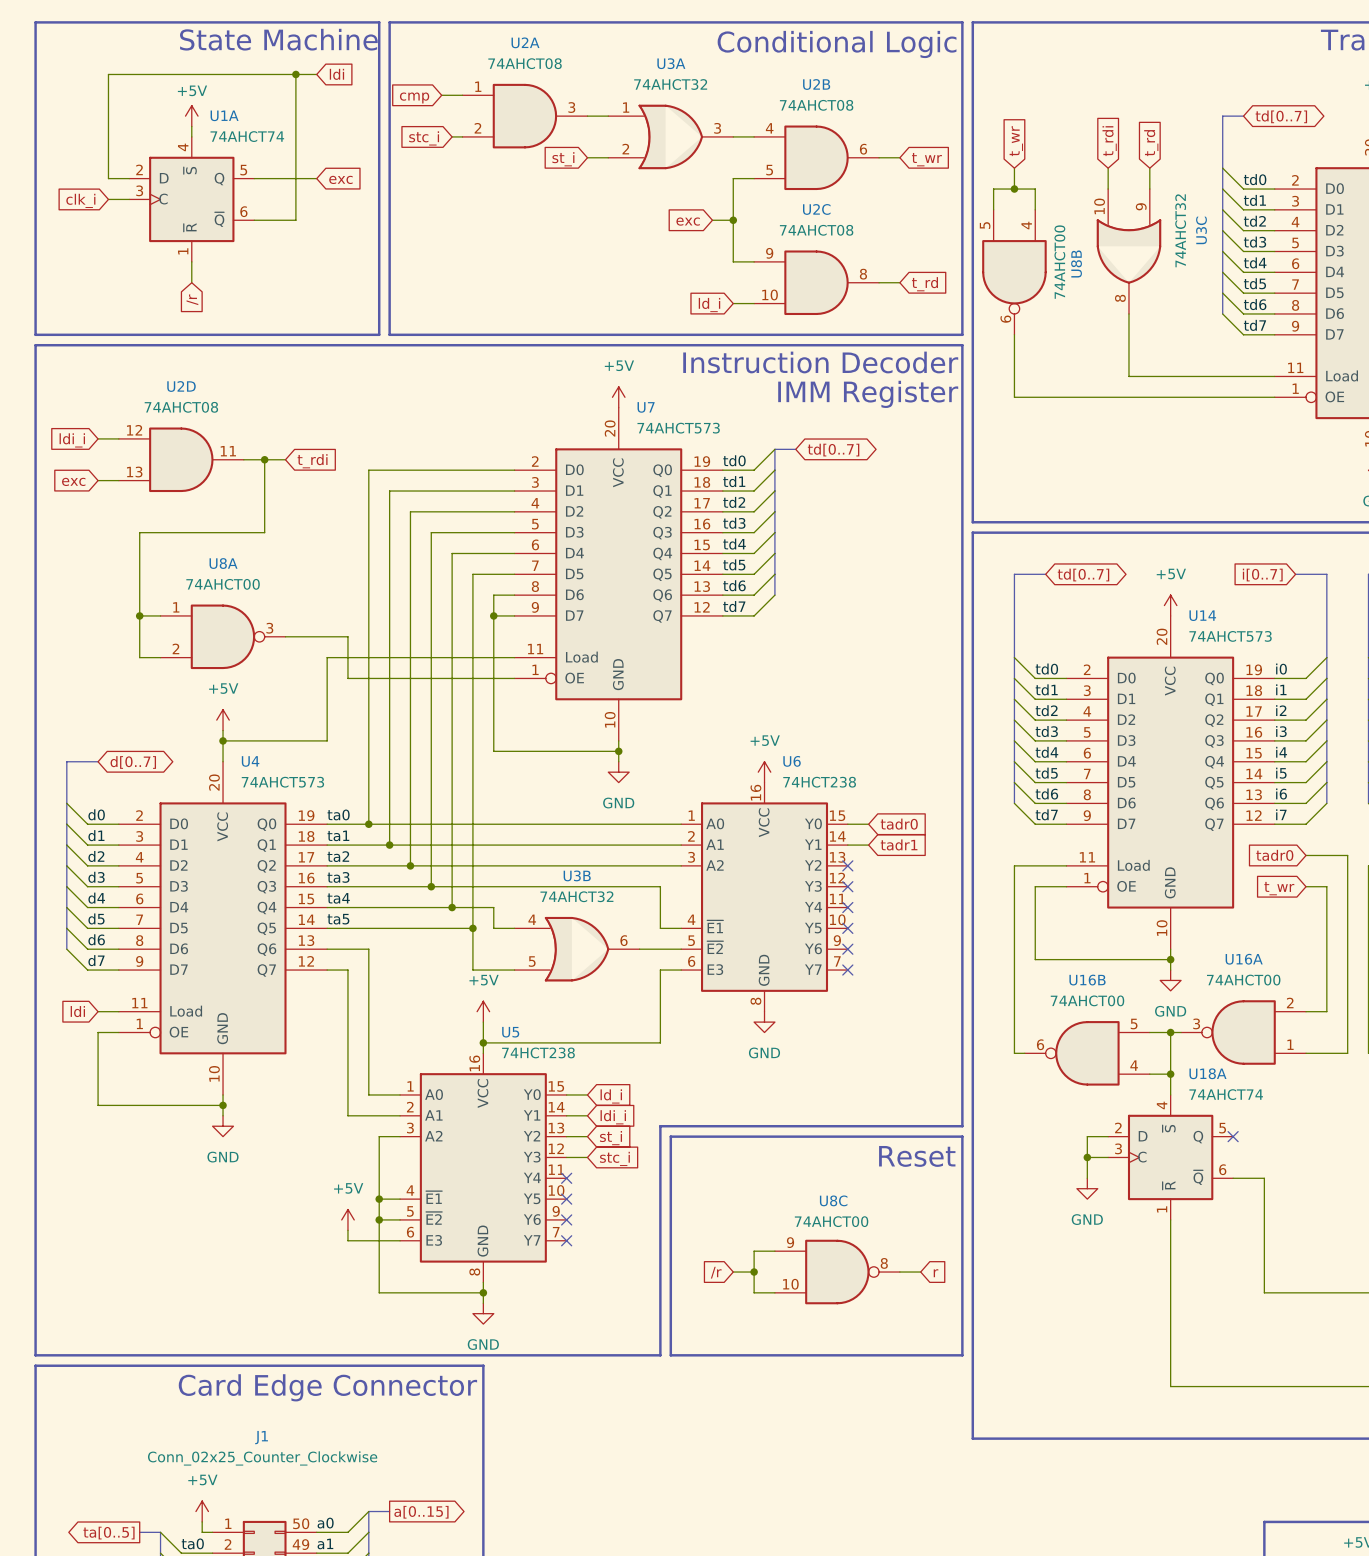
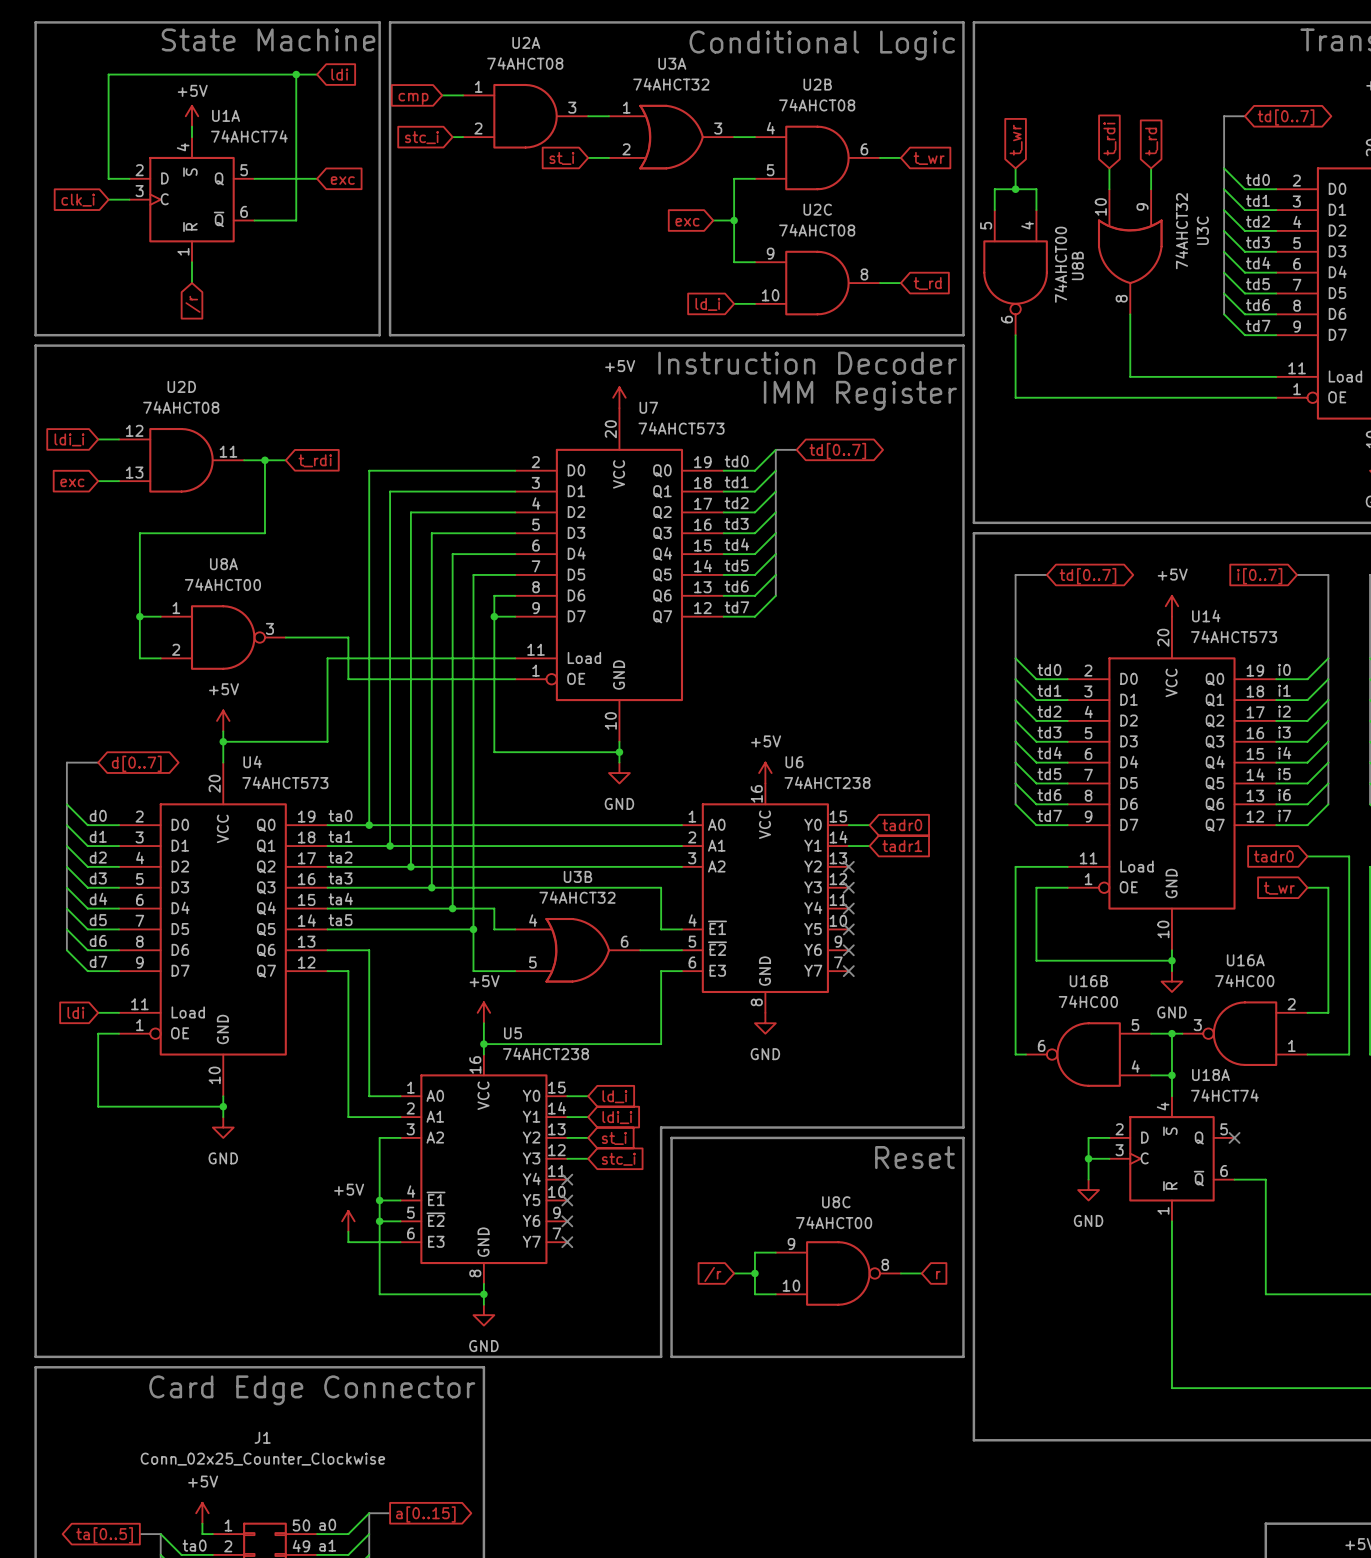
U6 value: 74HCT238 (819, 782) -> 74AHCT238 (827, 782)
U16A value: 74AHCT00 (1243, 980) -> 74HC00 (1244, 980)
U16B value: 74AHCT00 (1087, 1000) -> 74HC00 (1088, 1001)
U5 value: 74HCT238 (538, 1052) -> 74AHCT238 (546, 1053)
U18A value: 74AHCT74 (1226, 1094) -> 74HCT74 (1224, 1095)

